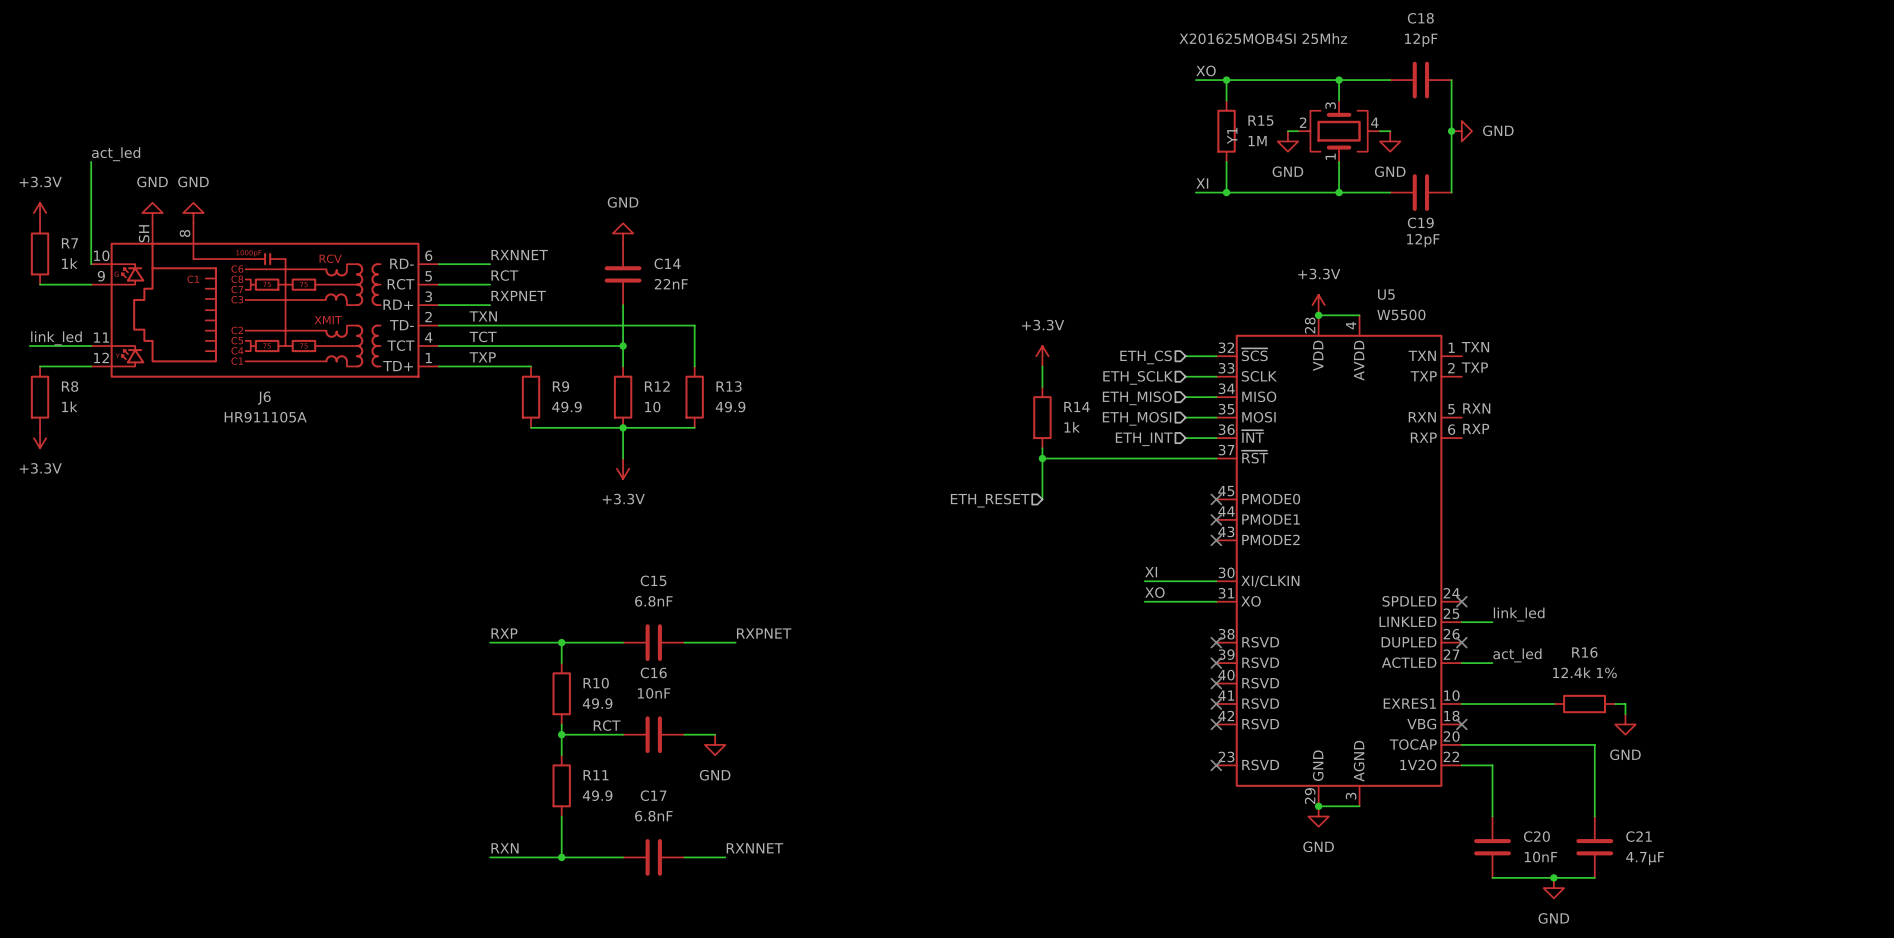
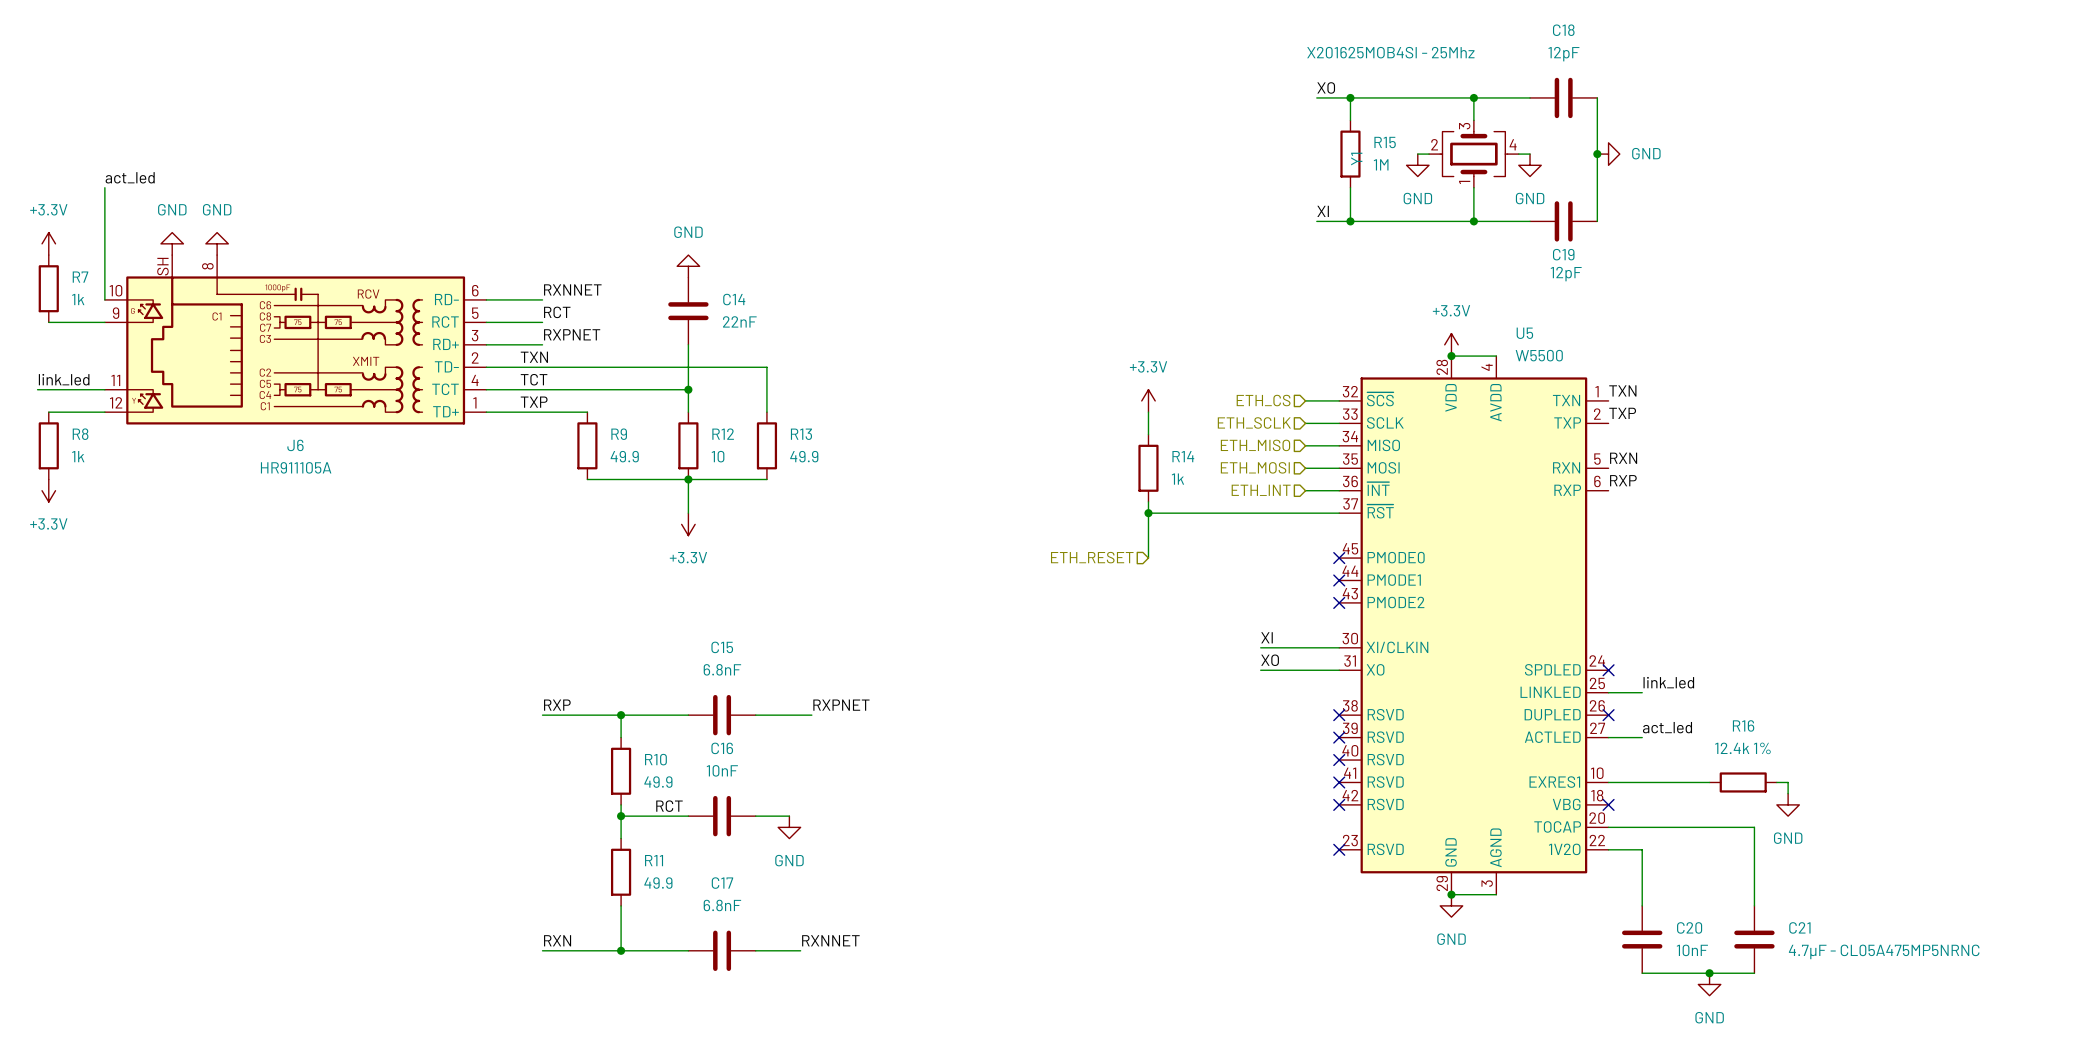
Y1 value: X201625MOB4SI 25Mhz (1263, 38) -> X201625MOB4SI - 25Mhz (1390, 52)
C21 value: 4.7µF (1645, 858) -> 4.7µF - CL05A475MP5NRNC (1884, 951)

